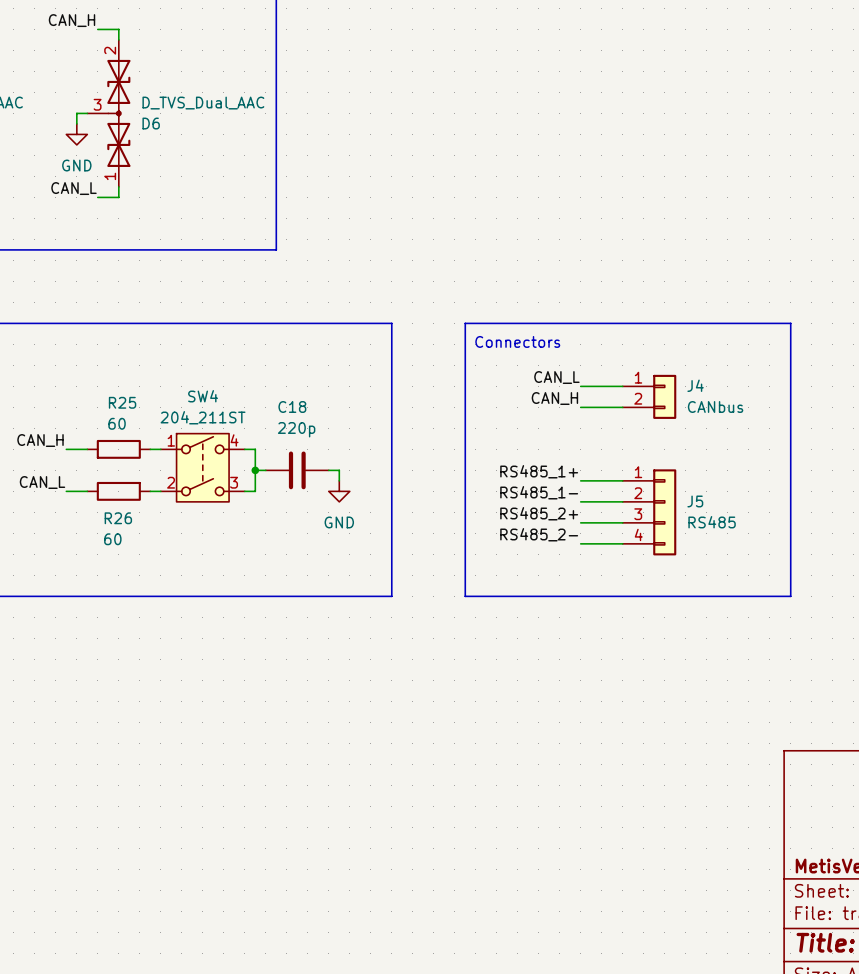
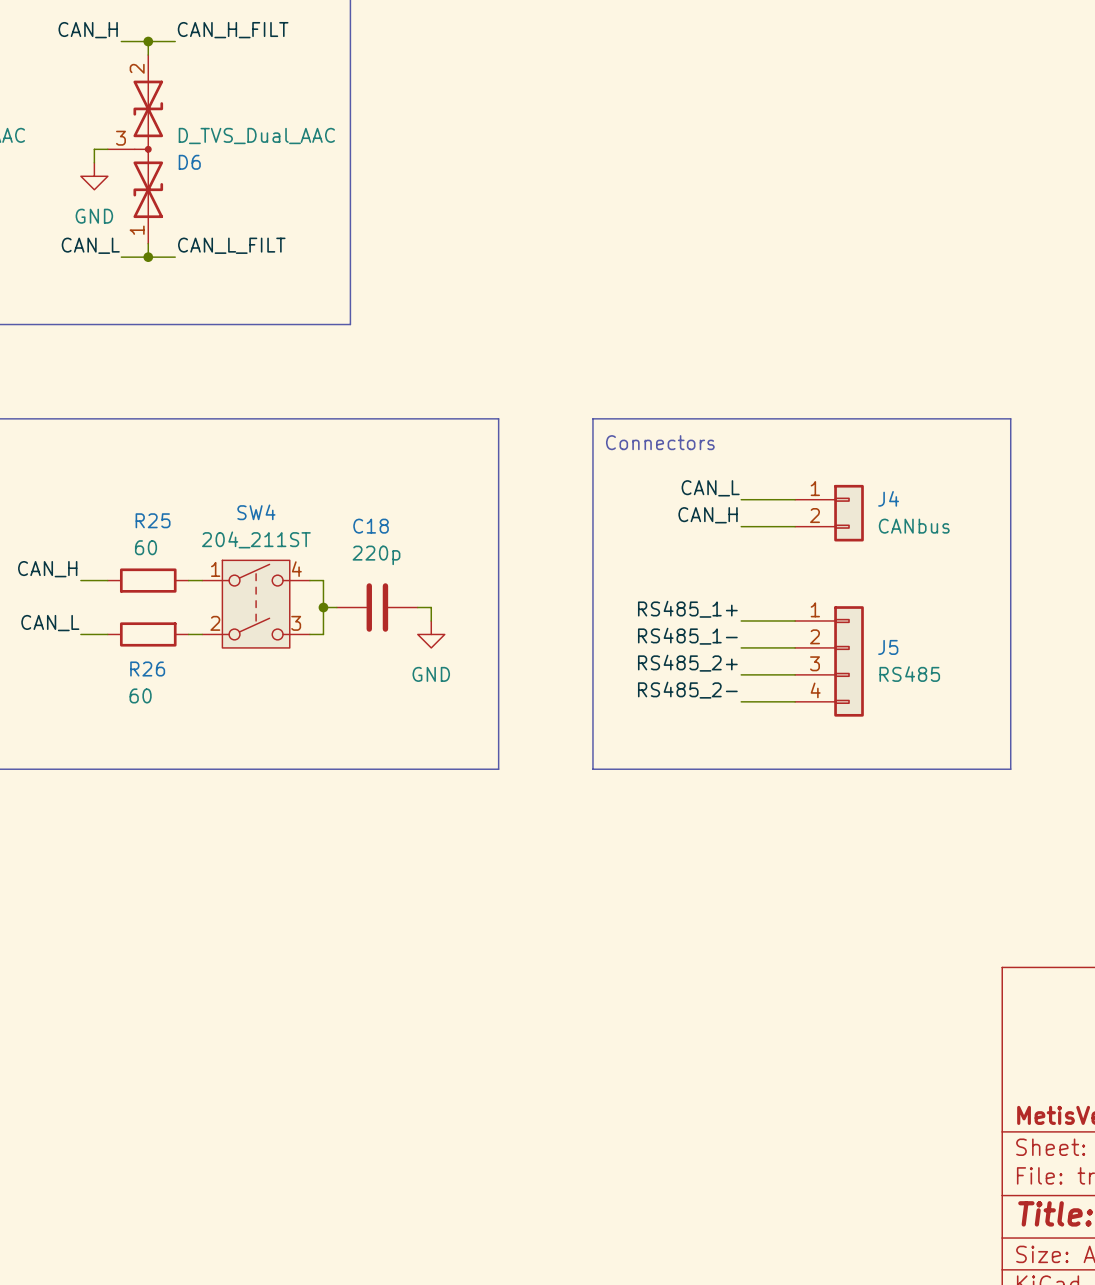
label: none -> CAN_H_FILT (233, 30)
wire: none -> (148, 41) (175, 41)
junction: none -> (148, 41)
label: none -> CAN_L_FILT (231, 245)
wire: none -> (148, 257) (175, 257)
junction: none -> (148, 257)

